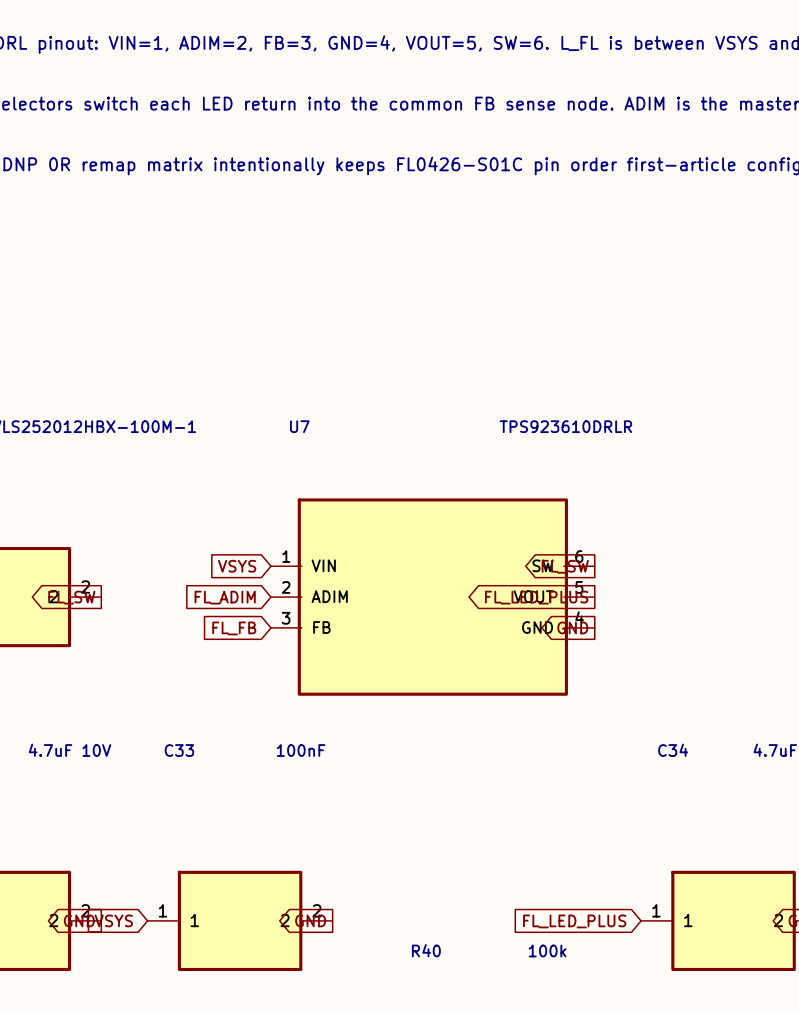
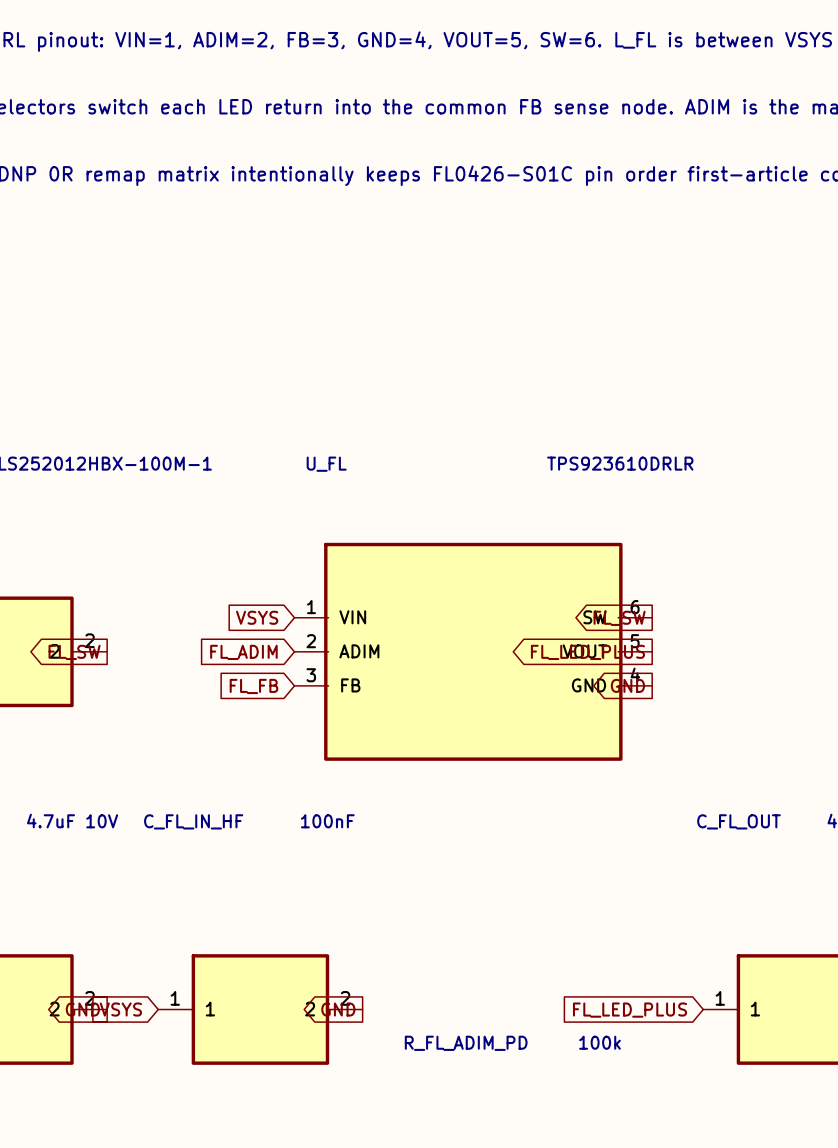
U7 name: U7 (299, 426) -> U_FL (326, 464)
C33 name: C33 (179, 750) -> C_FL_IN_HF (193, 821)
C34 name: C34 (673, 750) -> C_FL_OUT (738, 821)
R40 name: R40 (426, 950) -> R_FL_ADIM_PD (466, 1043)

